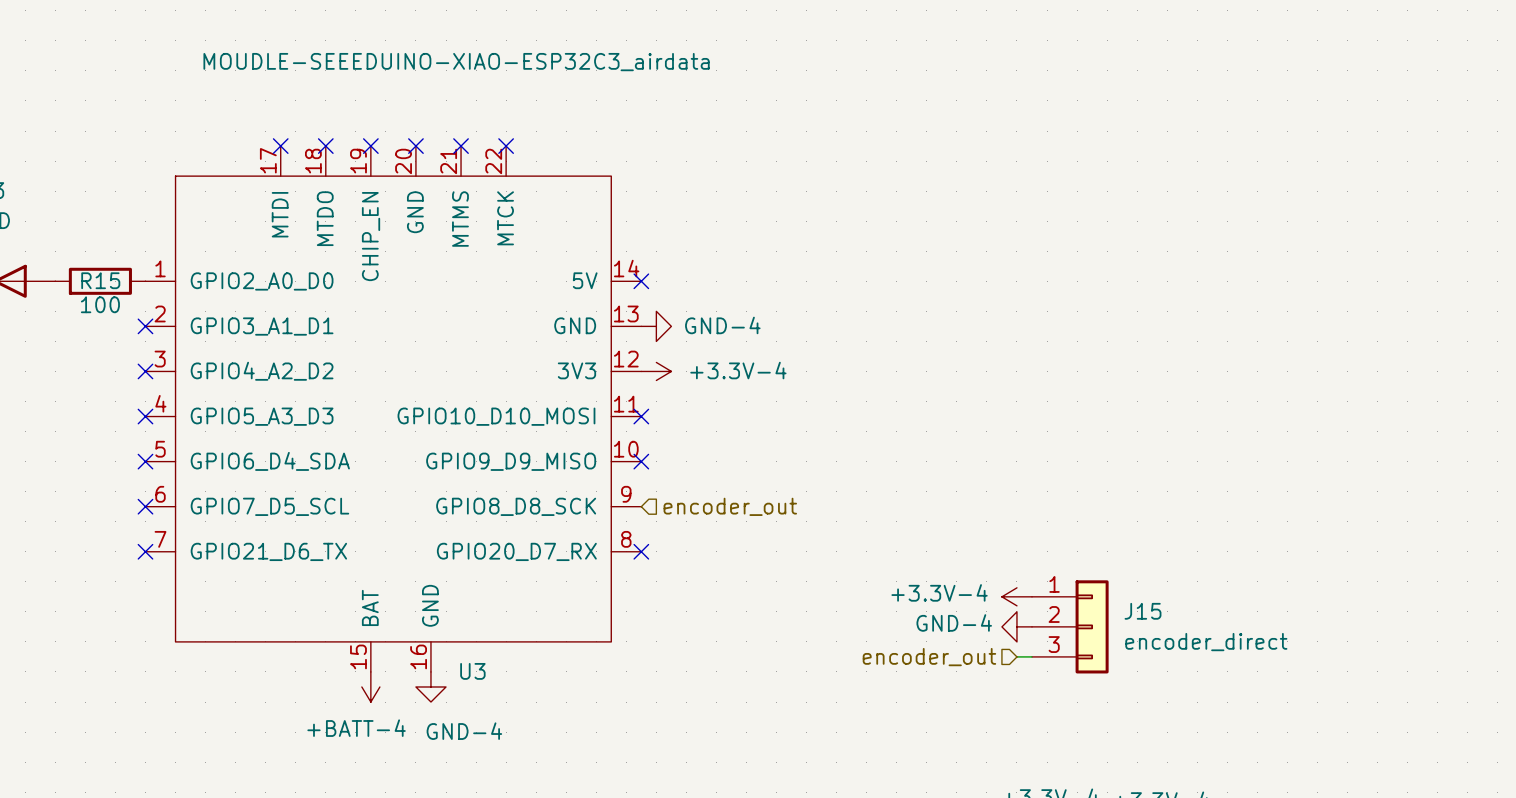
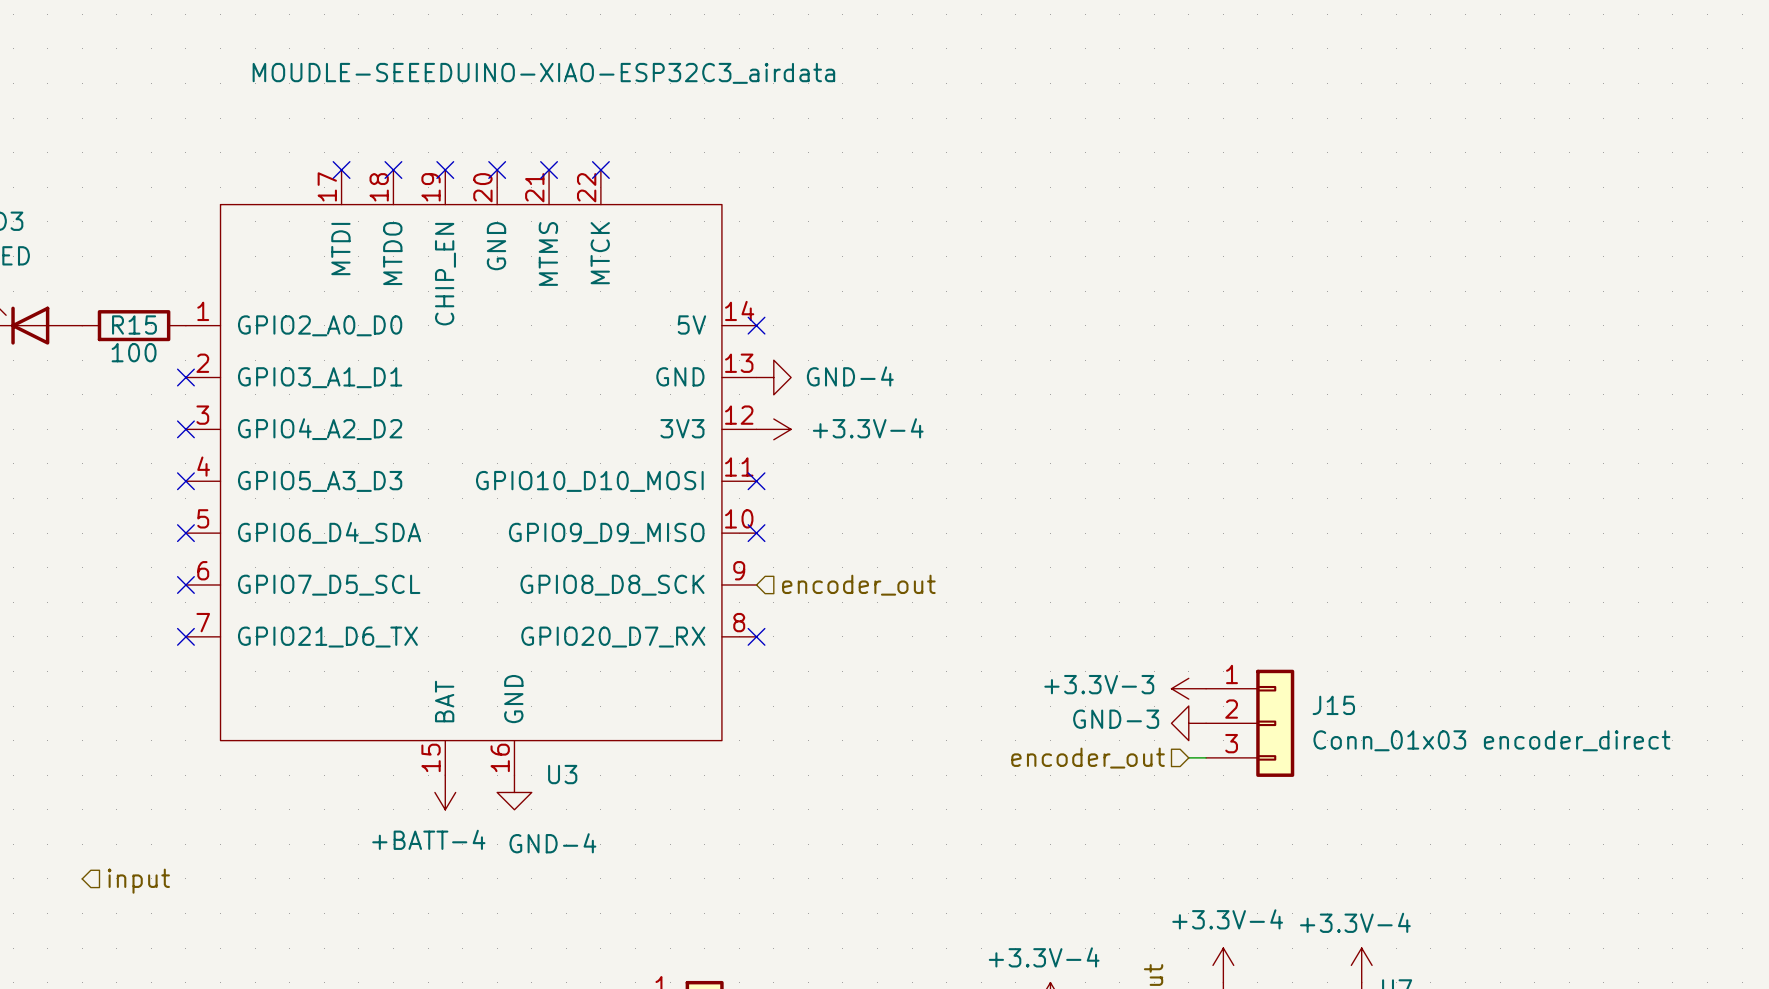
power symbol: +3.3V-4 (1016, 596) -> +3.3V-3 (1188, 688)
power symbol: GND-4 (1016, 626) -> GND-3 (1188, 723)
J15 value: encoder_direct (1206, 642) -> Conn_01x03 encoder_direct (1491, 740)
hierarchical label: none -> input (138, 881)

